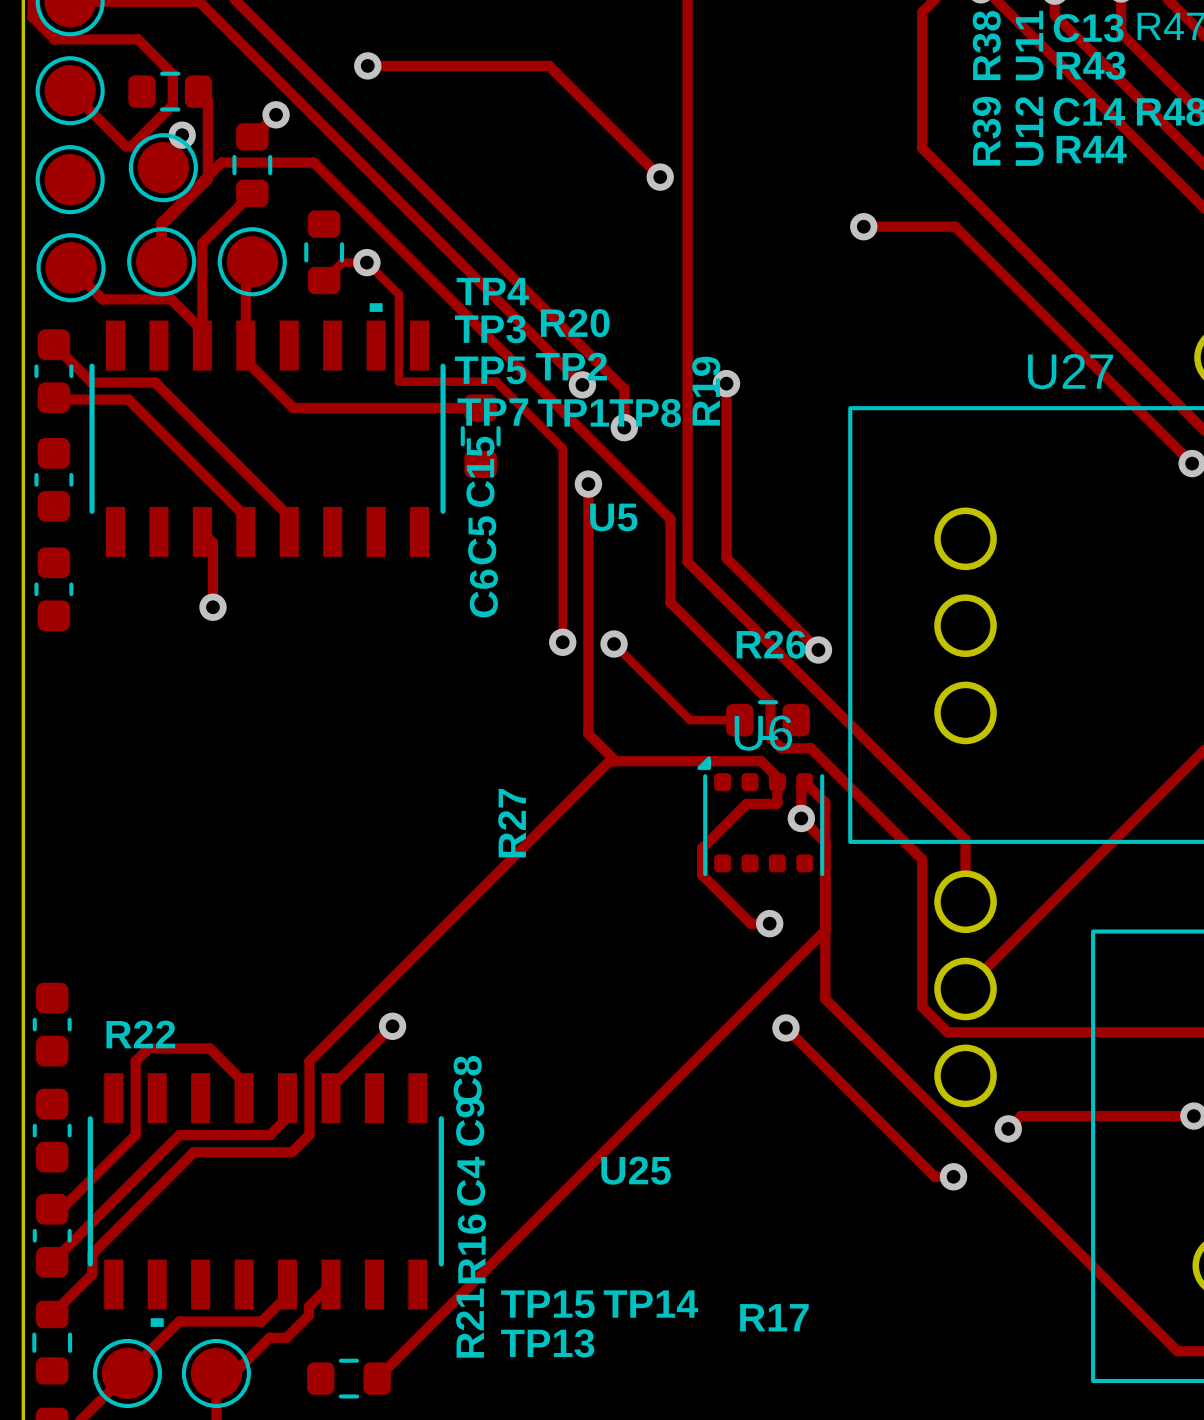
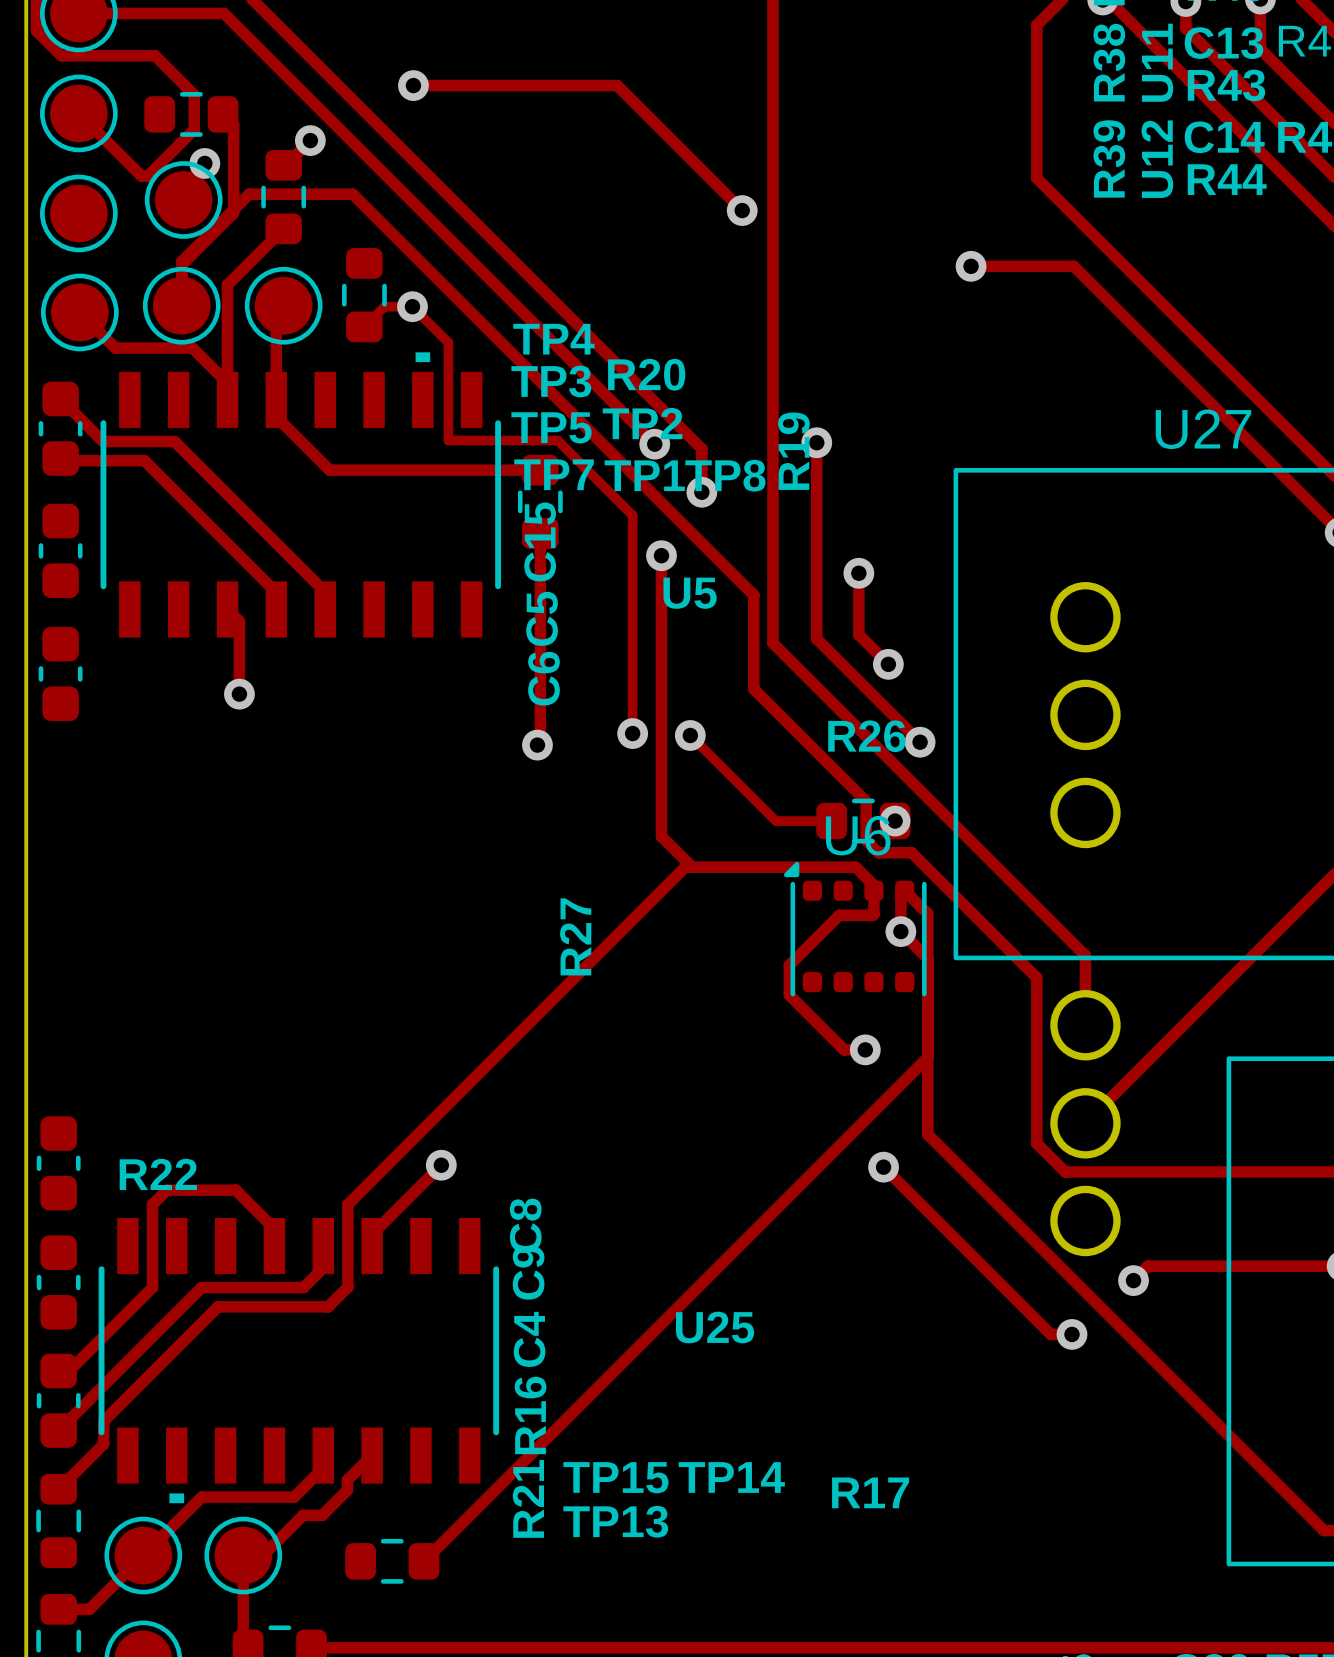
track: none -> (540, 533) (540, 742) (537, 745)
track: none -> (858, 573) (858, 634) (888, 664)
via: none -> (858, 573)
via: none -> (888, 664)
via: none -> (537, 745)
via: none -> (895, 821)

